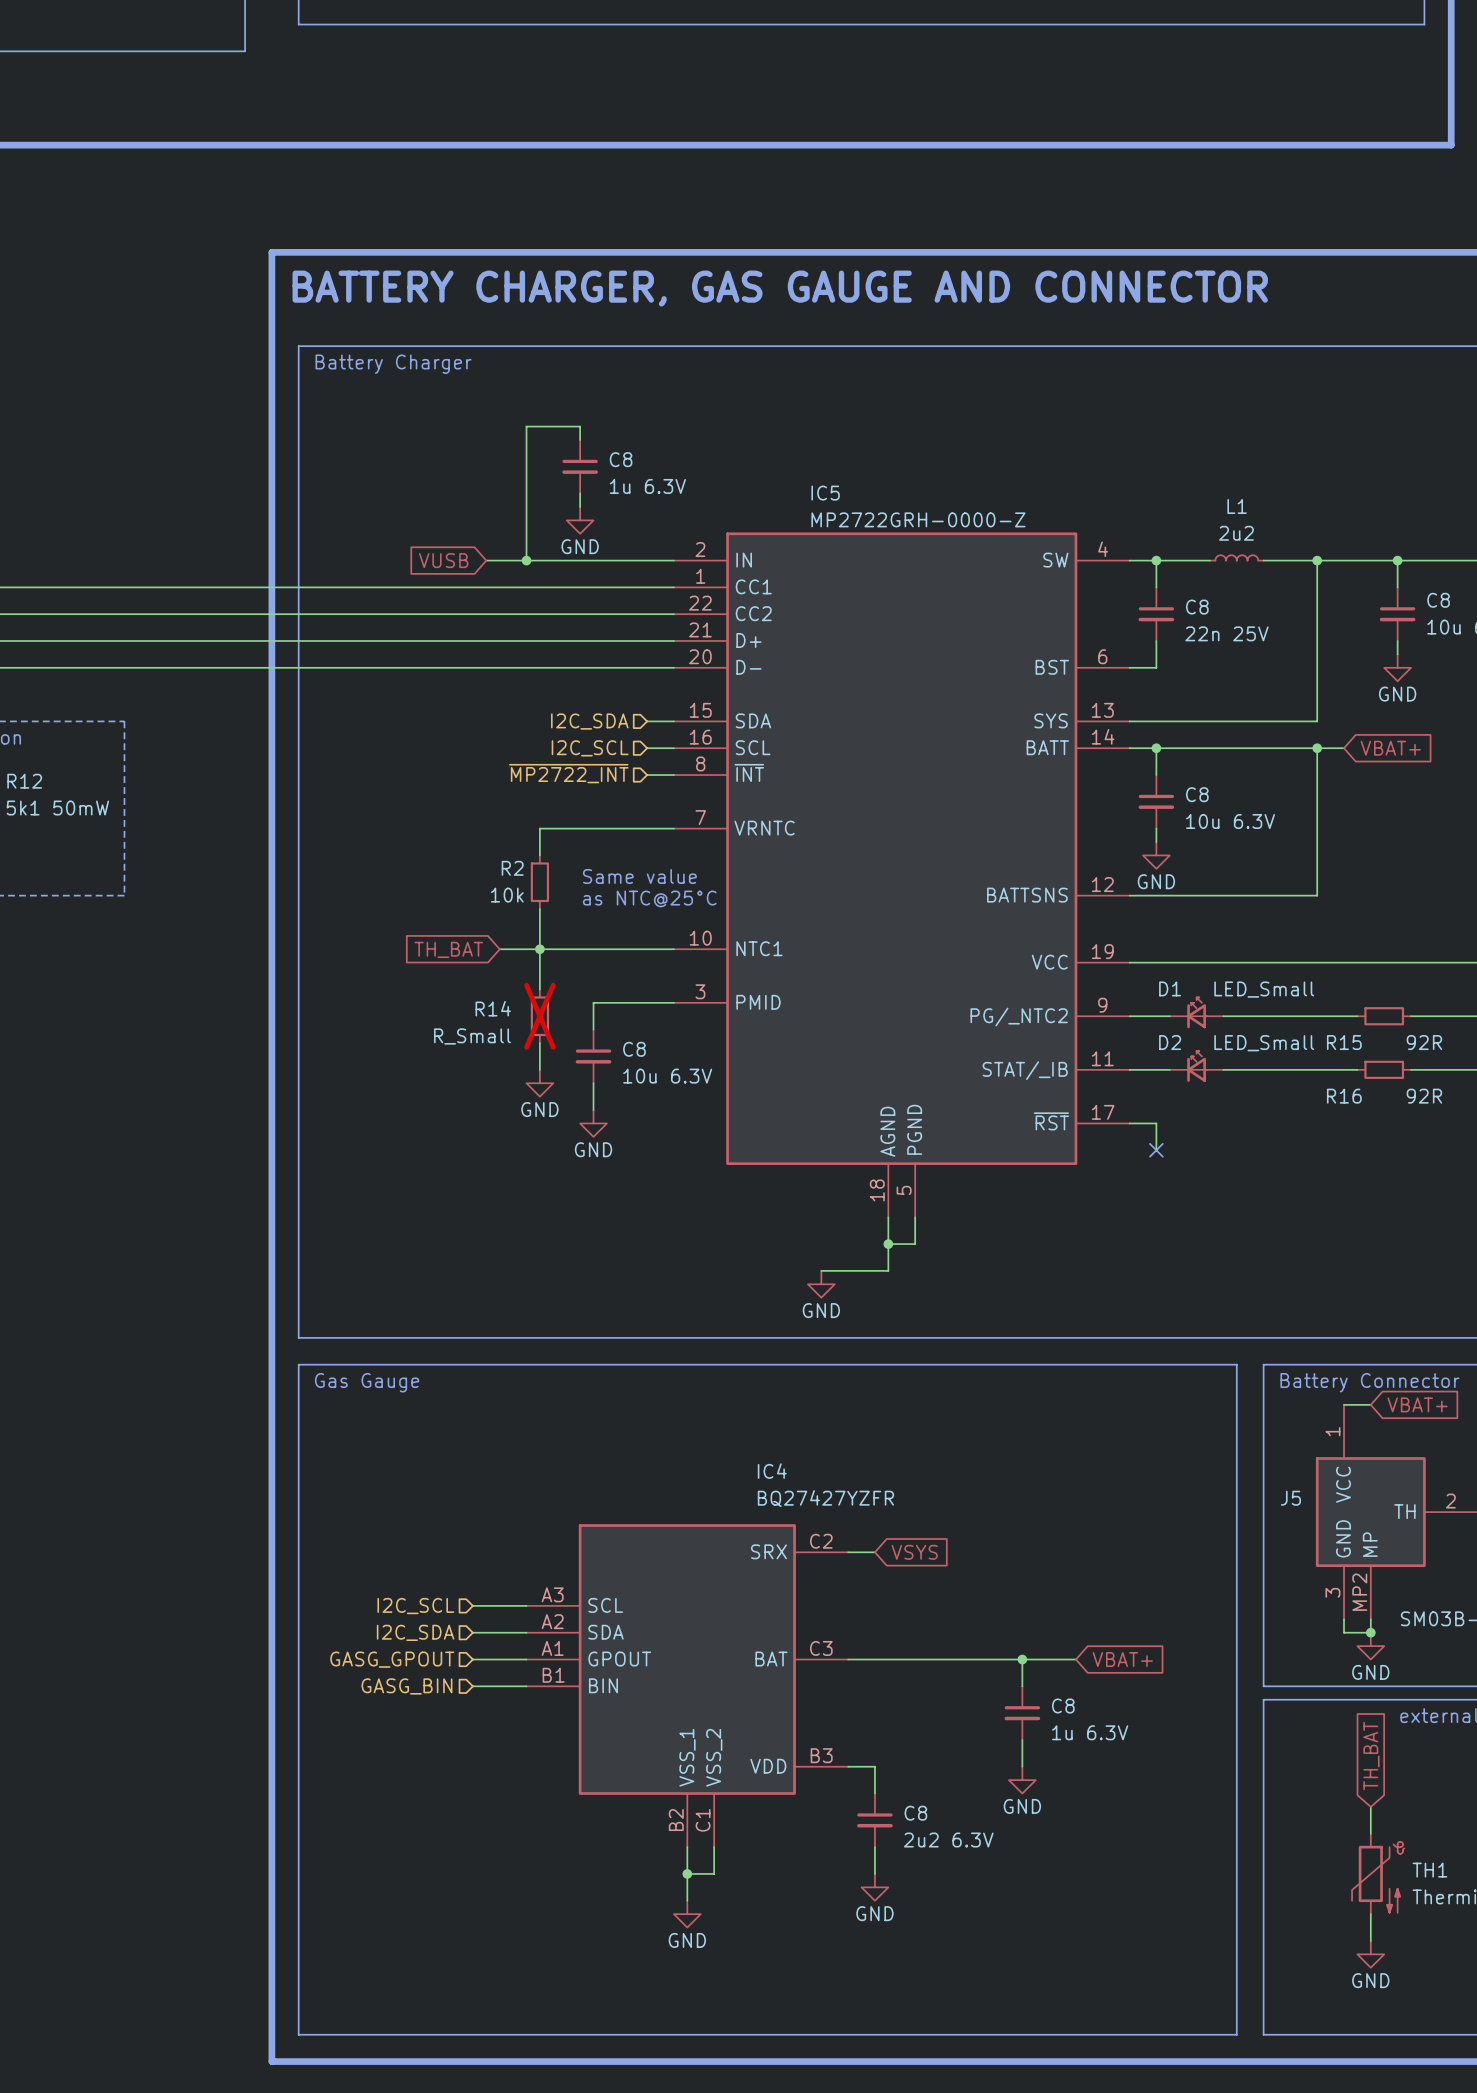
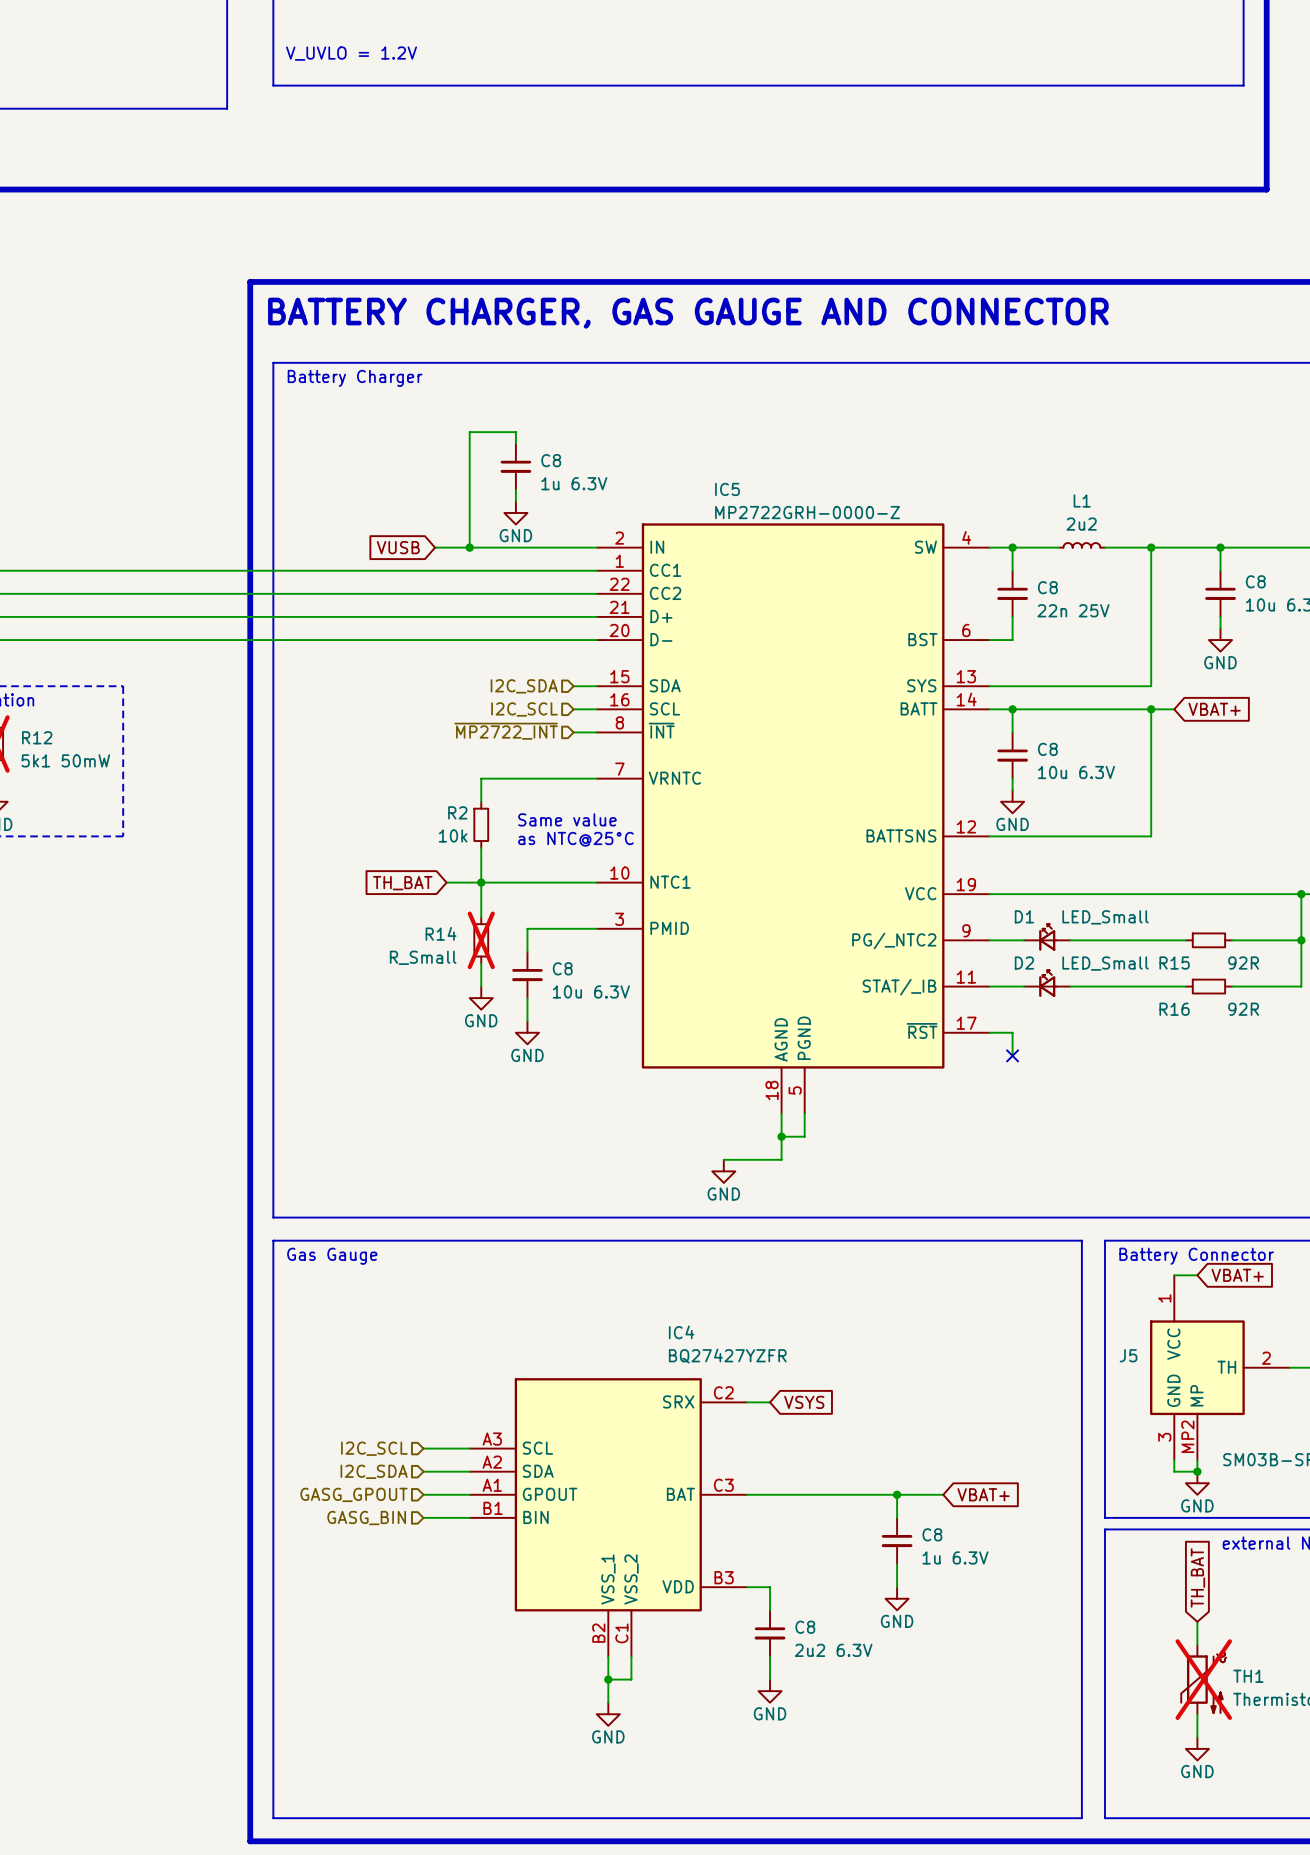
TH1 do-not-place cross: none -> (1203, 1679)

